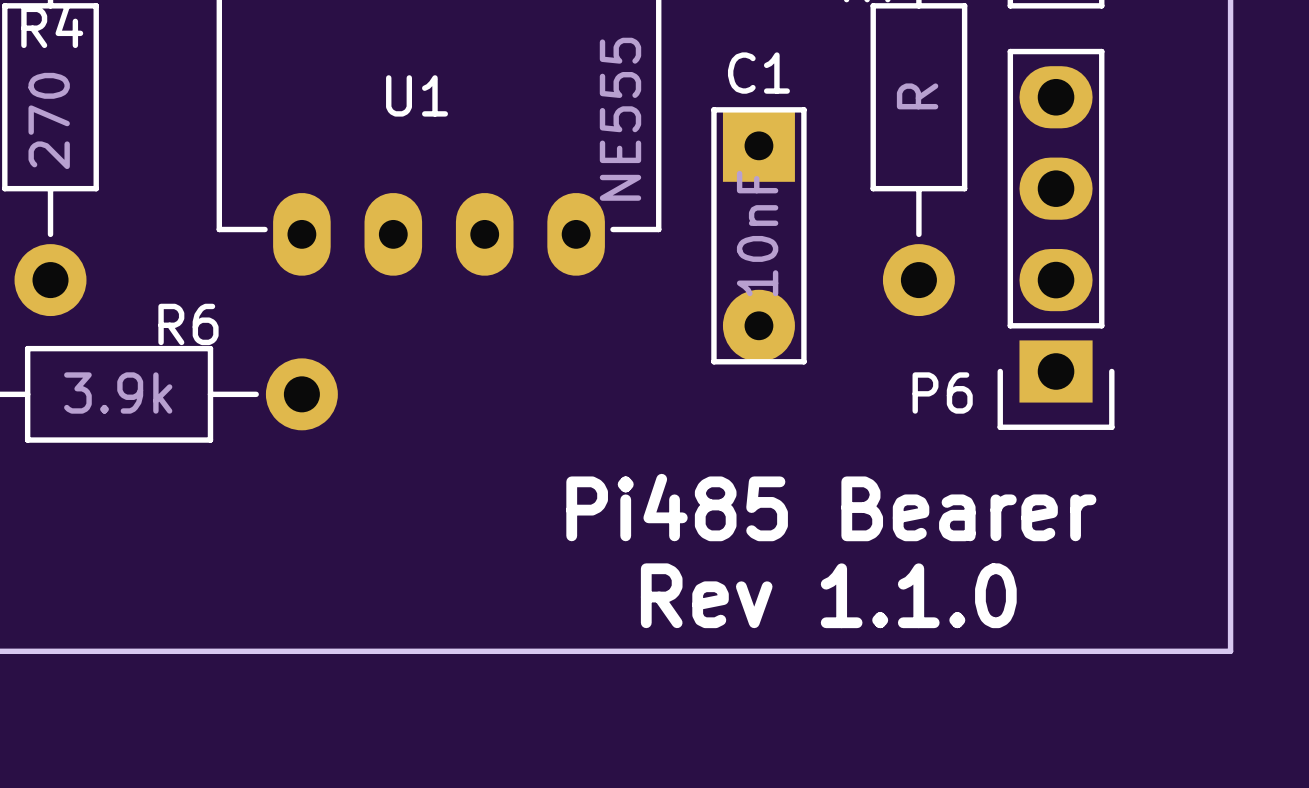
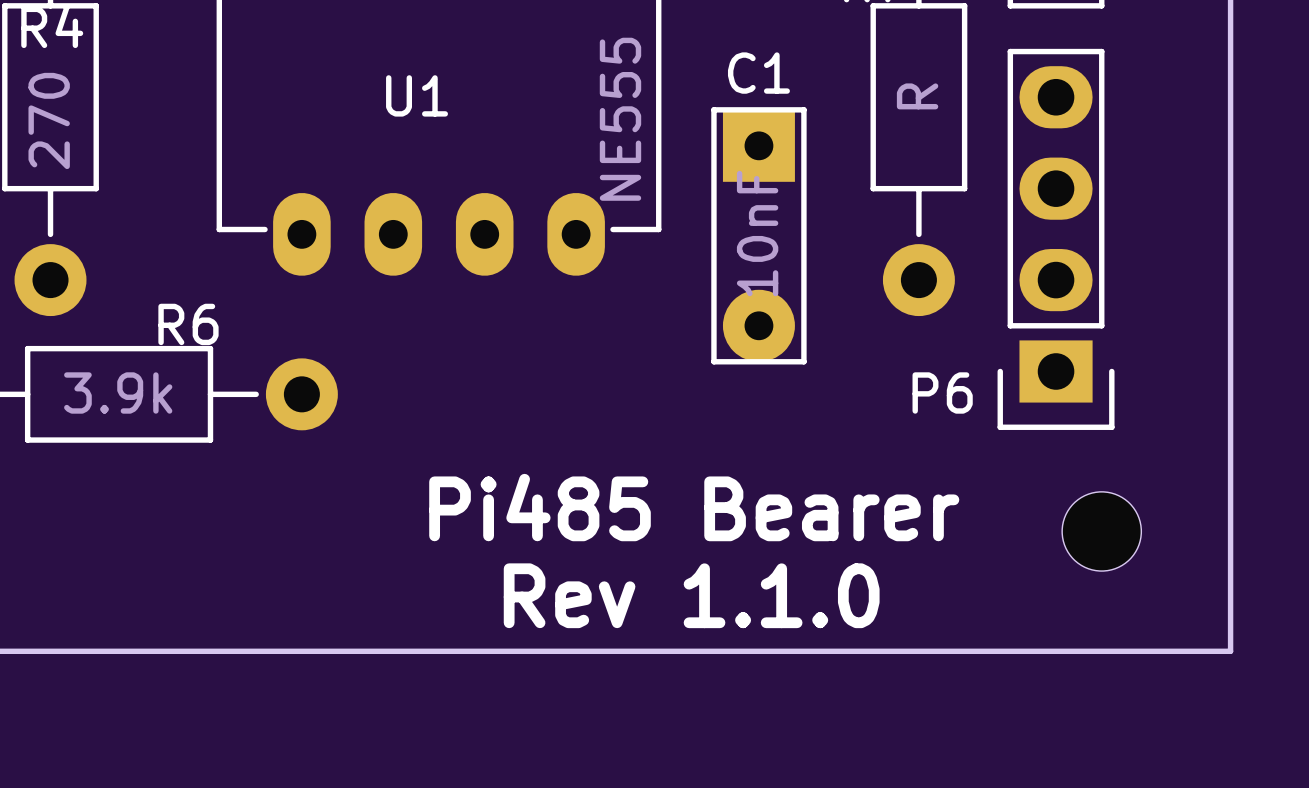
text position: Pi485 Bearer (831, 507) -> Pi485 Bearer (694, 507)
part: none -> (1101, 531)
text position: Rev 1.1.0 (828, 595) -> Rev 1.1.0 (691, 595)

